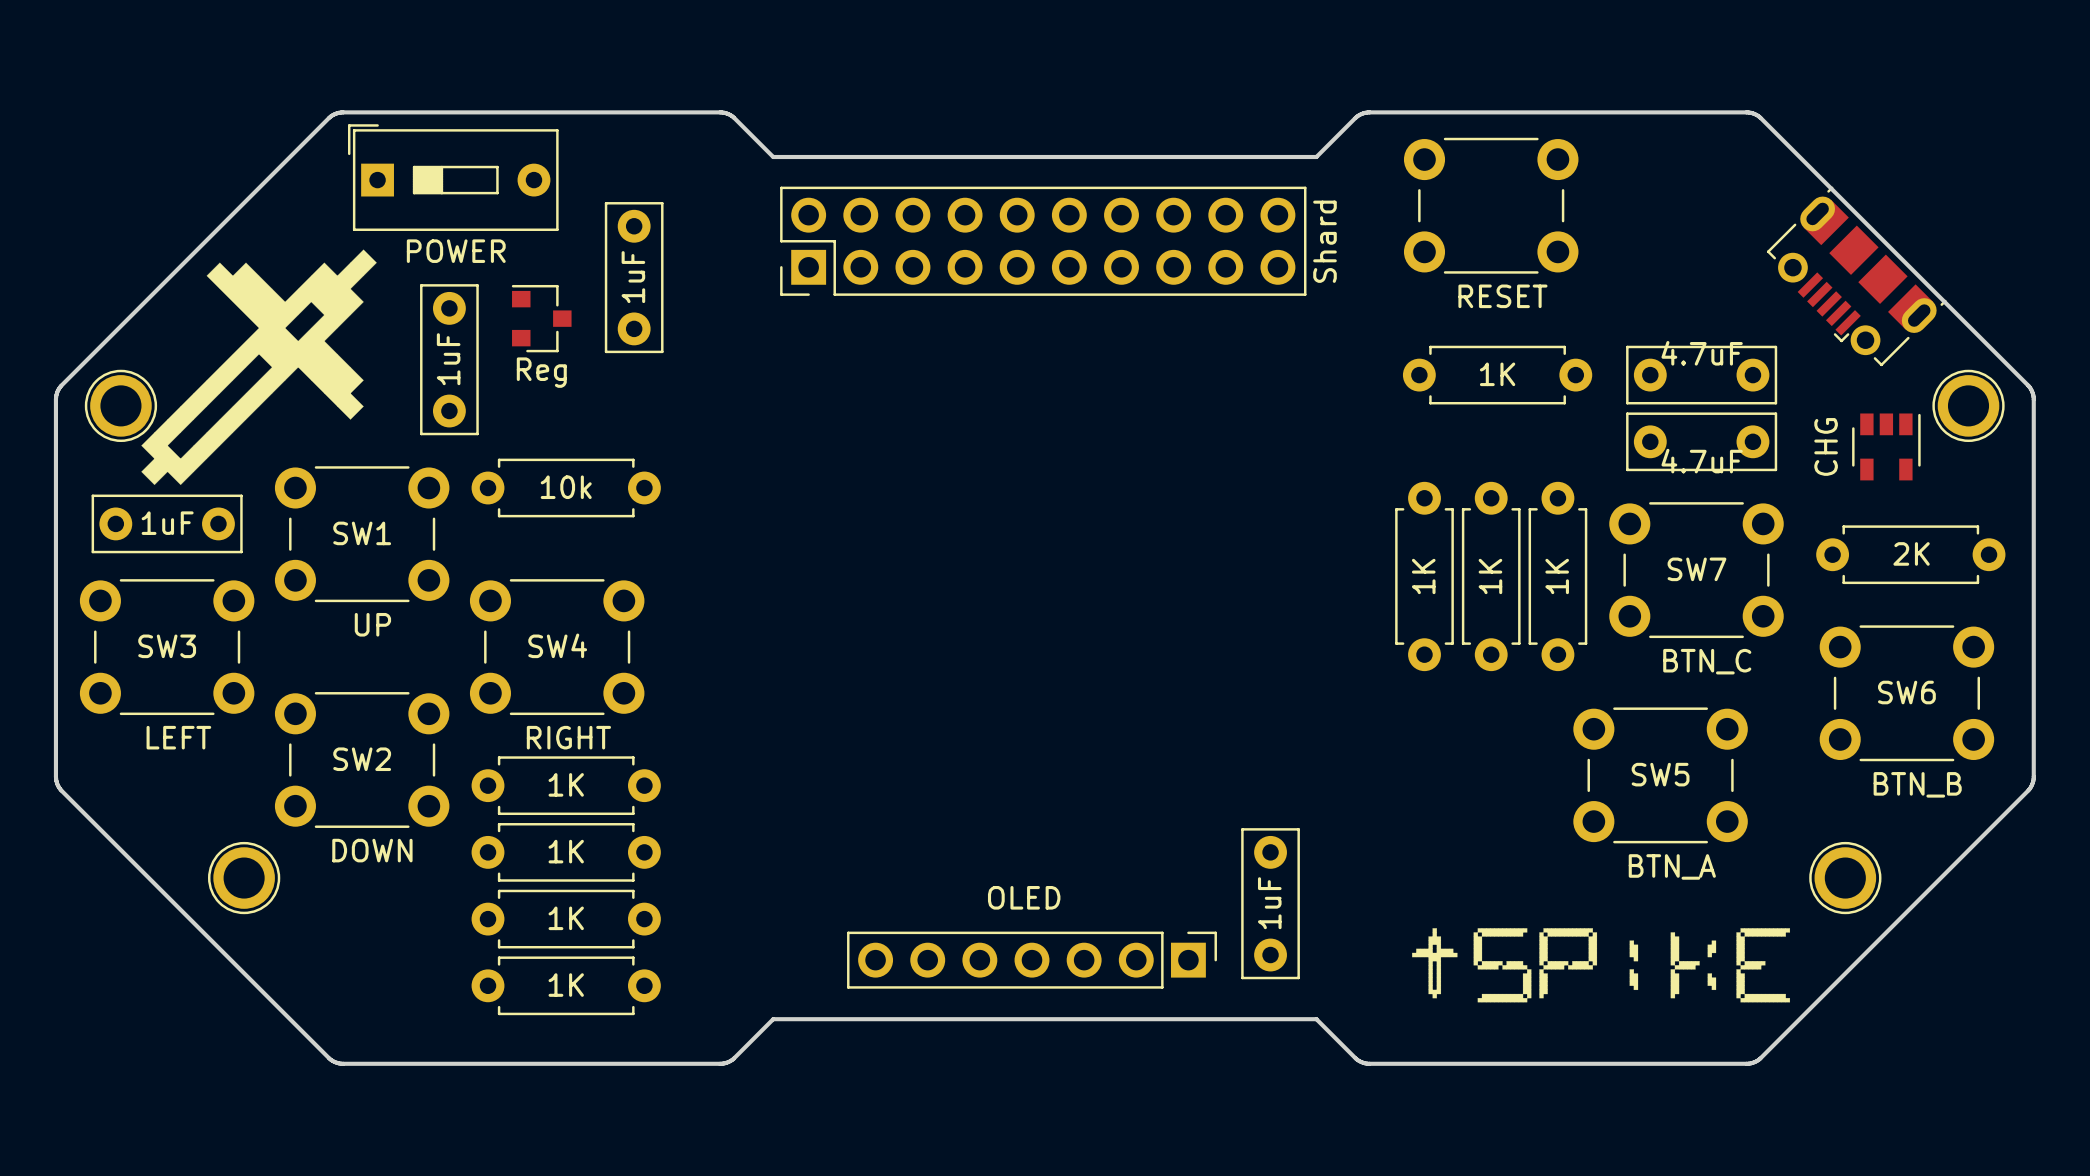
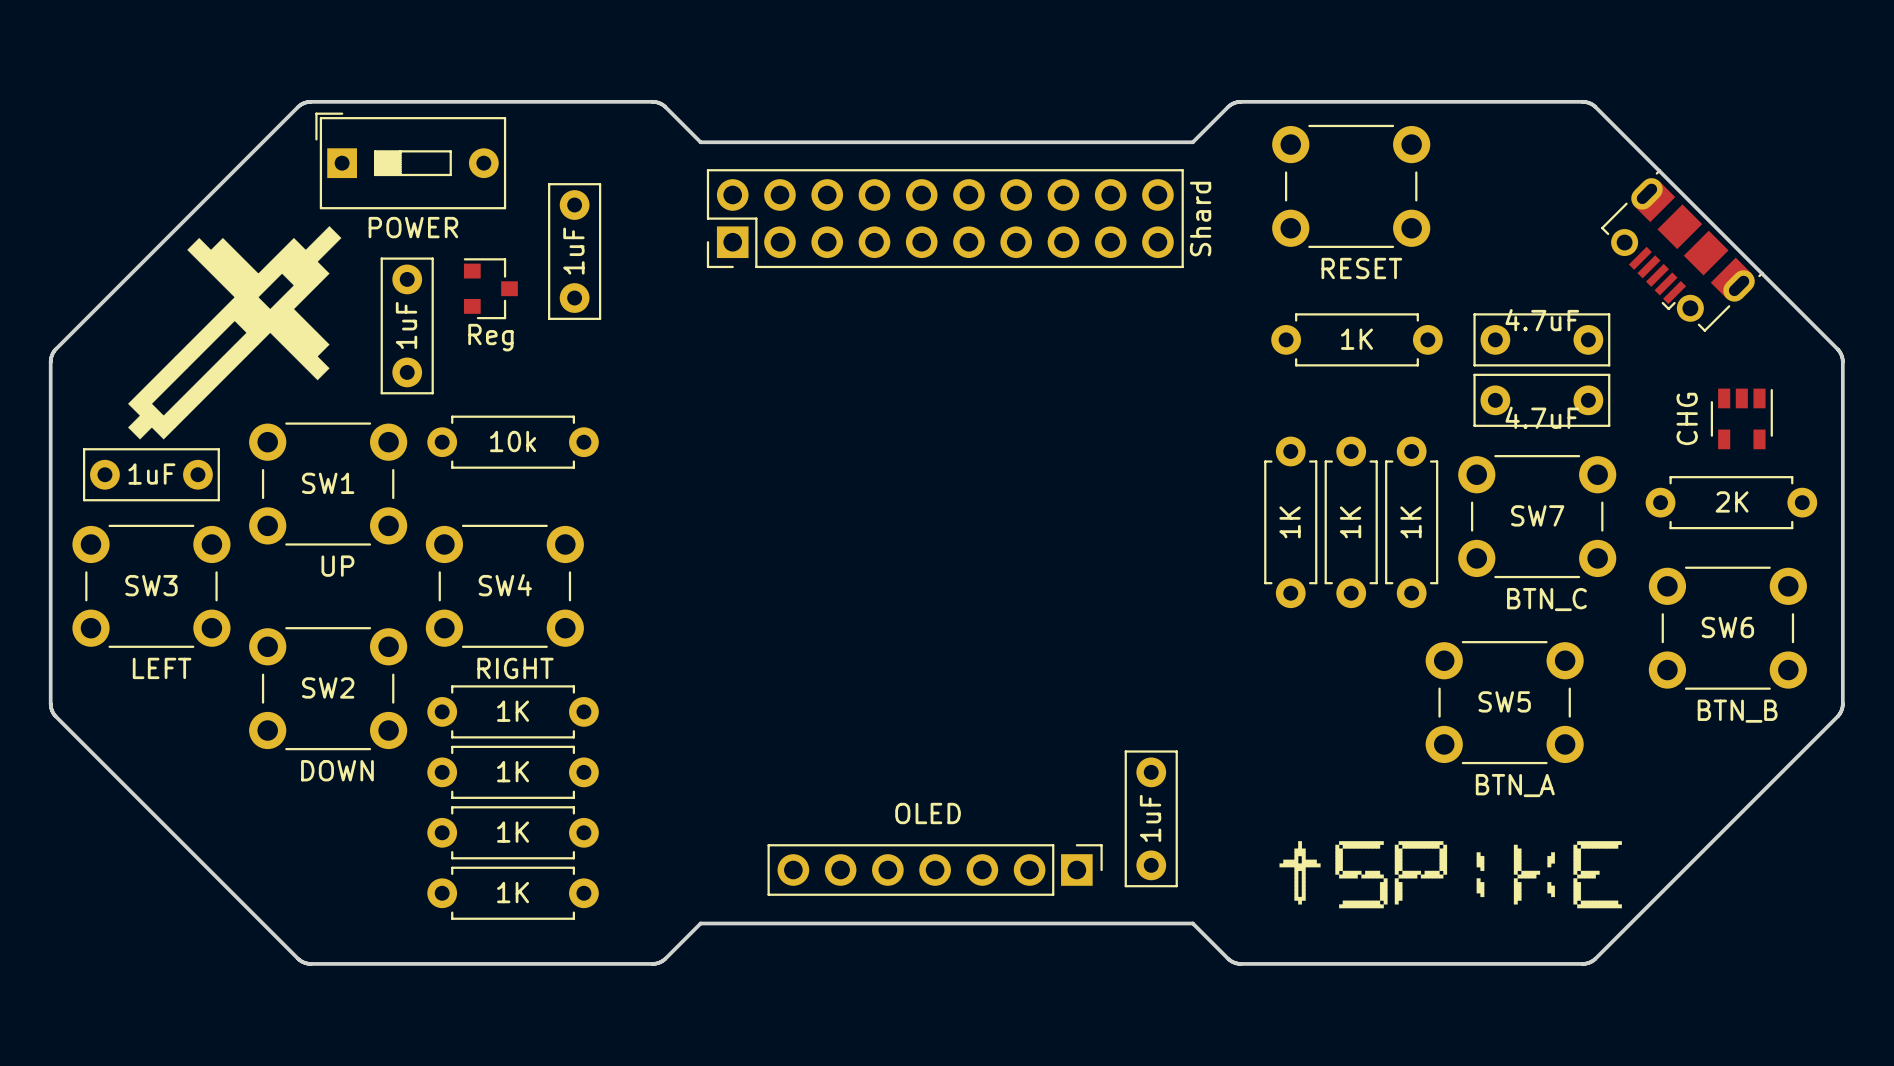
part: (120, 405) -> none
part: (1968, 405) -> none
part position: (1886, 446) -> (1741, 418)
part: (244, 878) -> none
part: (1845, 878) -> none

